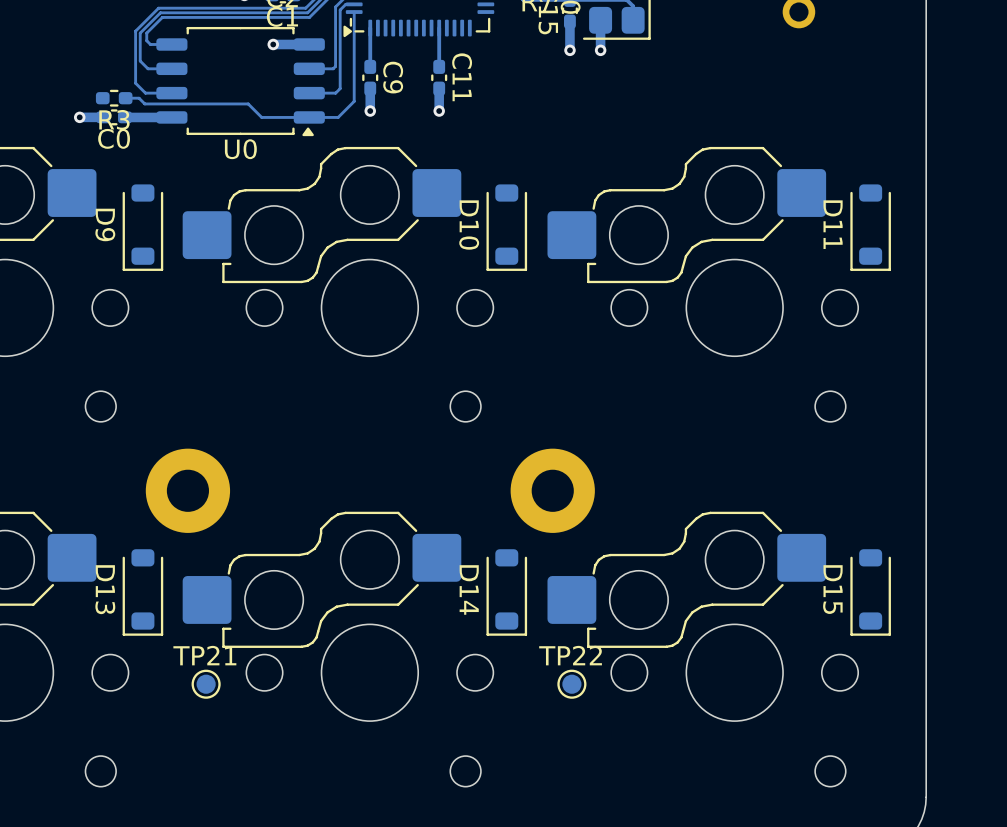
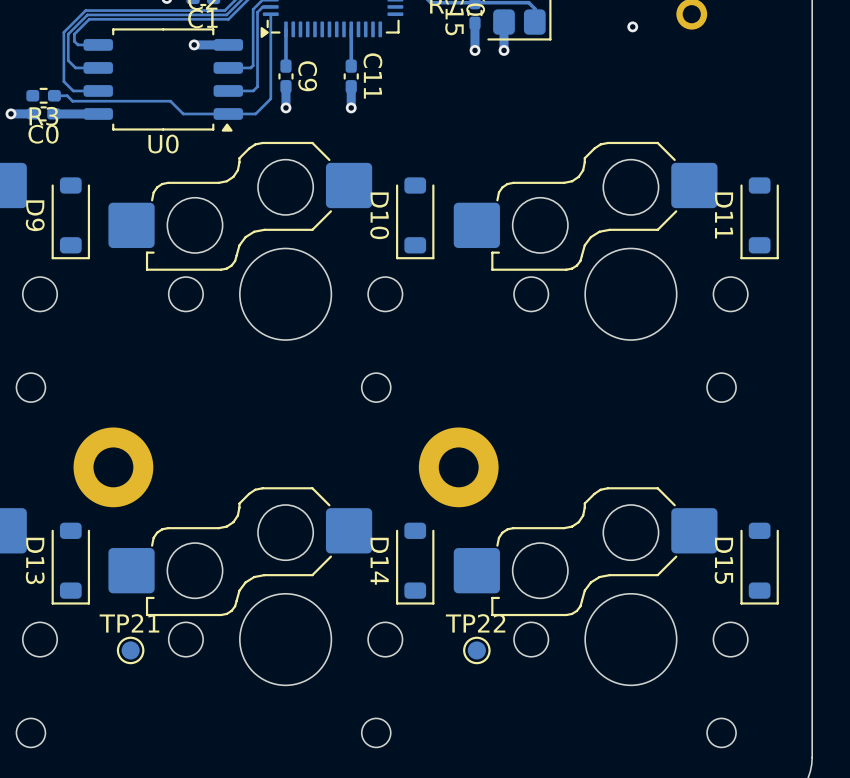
via: none -> (632, 26)

